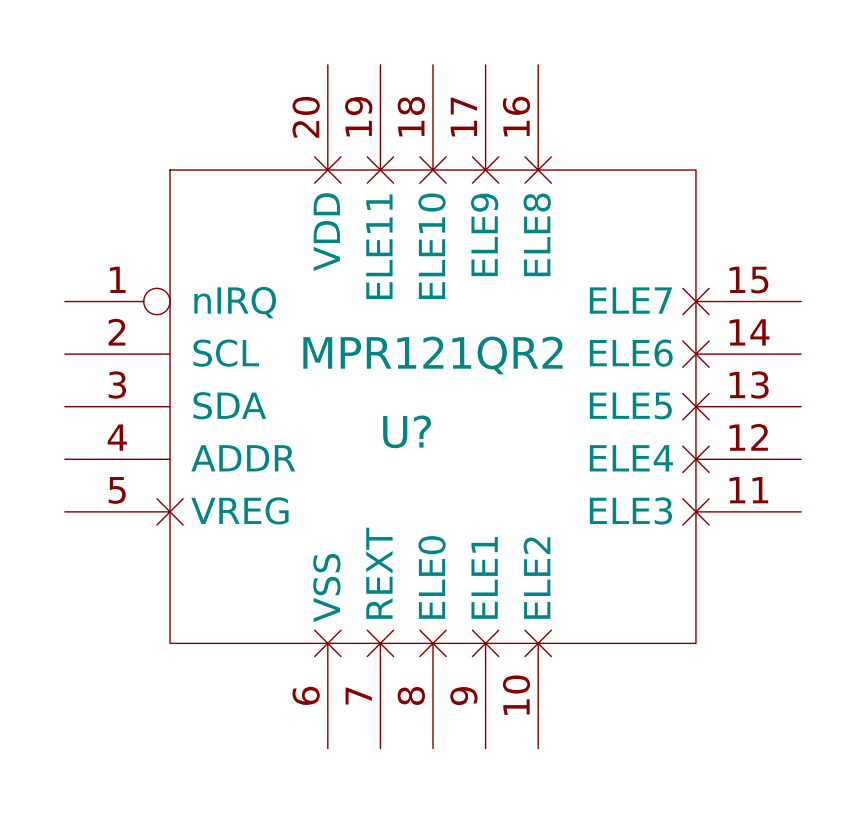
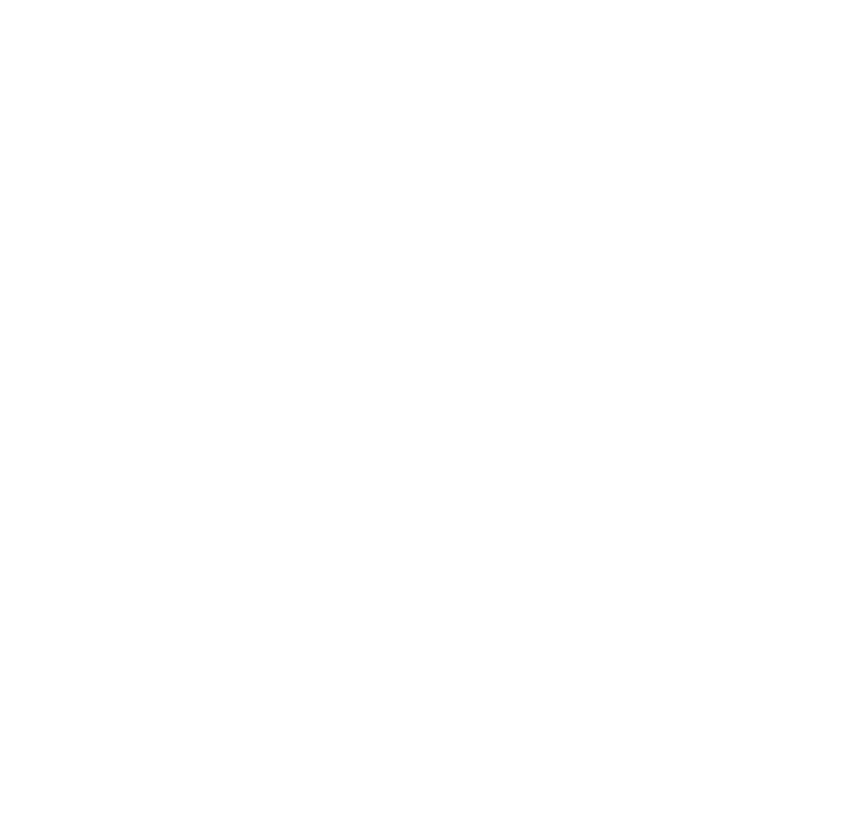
U?: MPR121QR2 (433, 406) -> none

